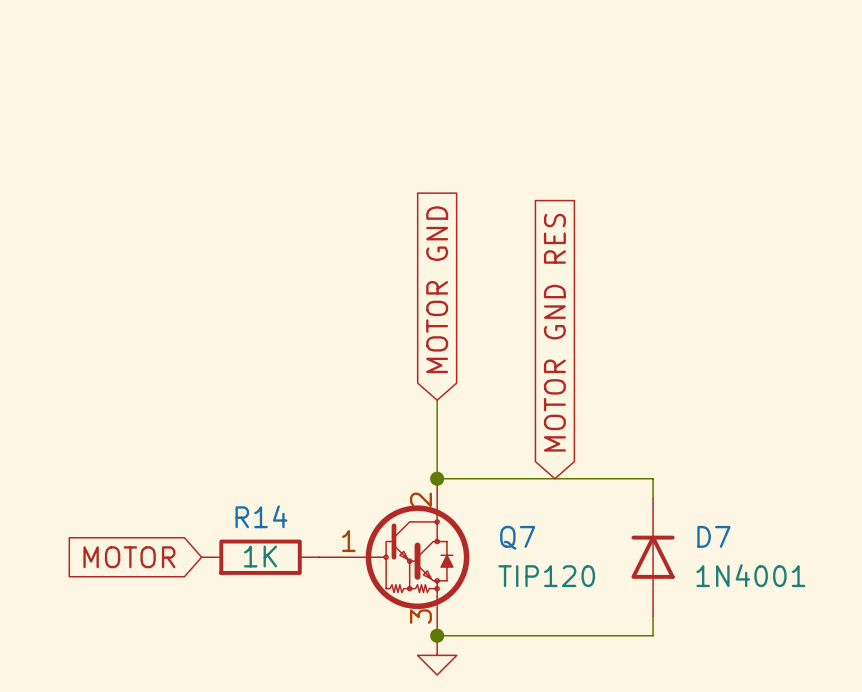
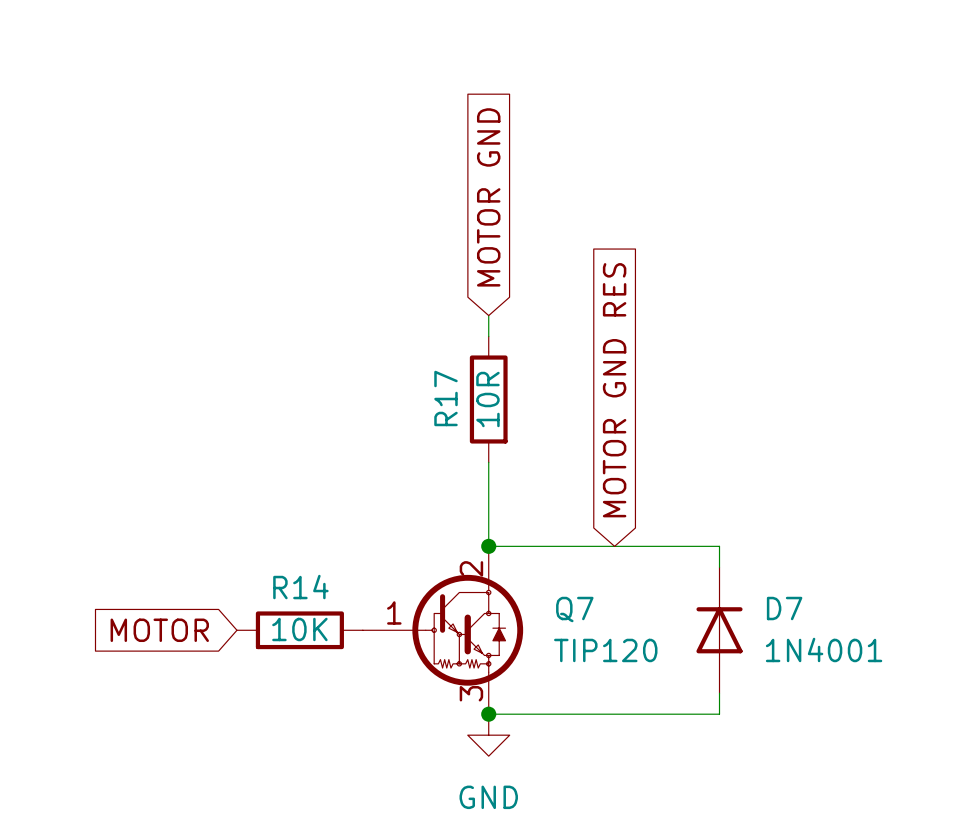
wire: none -> (488, 315) (488, 336)
global label position: MOTOR GND (437, 289) -> MOTOR GND (488, 197)
R17: none -> 10R (488, 399)
R14 value: 1K (260, 556) -> 10K (299, 629)

